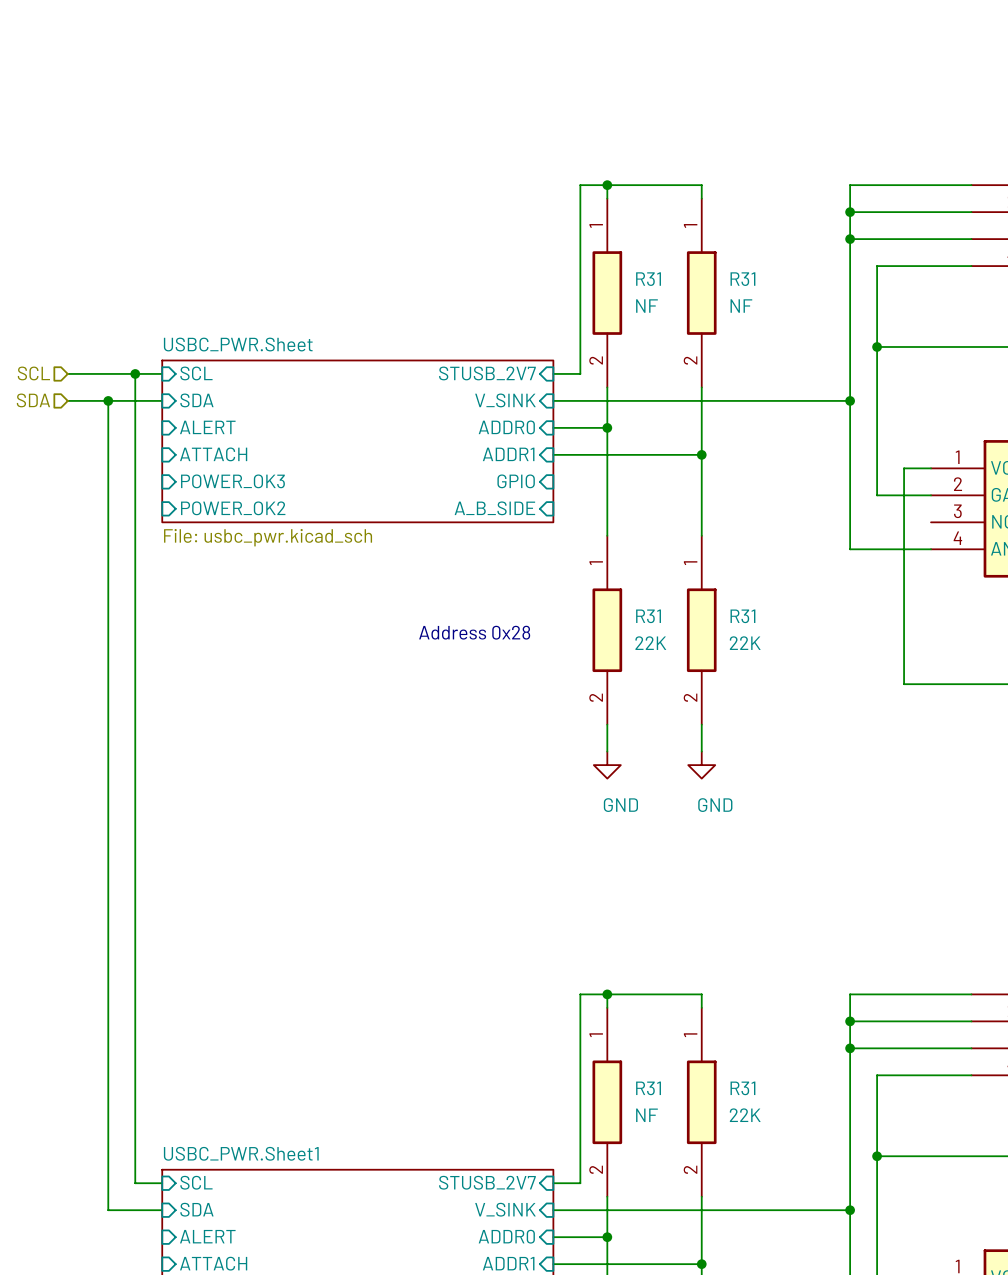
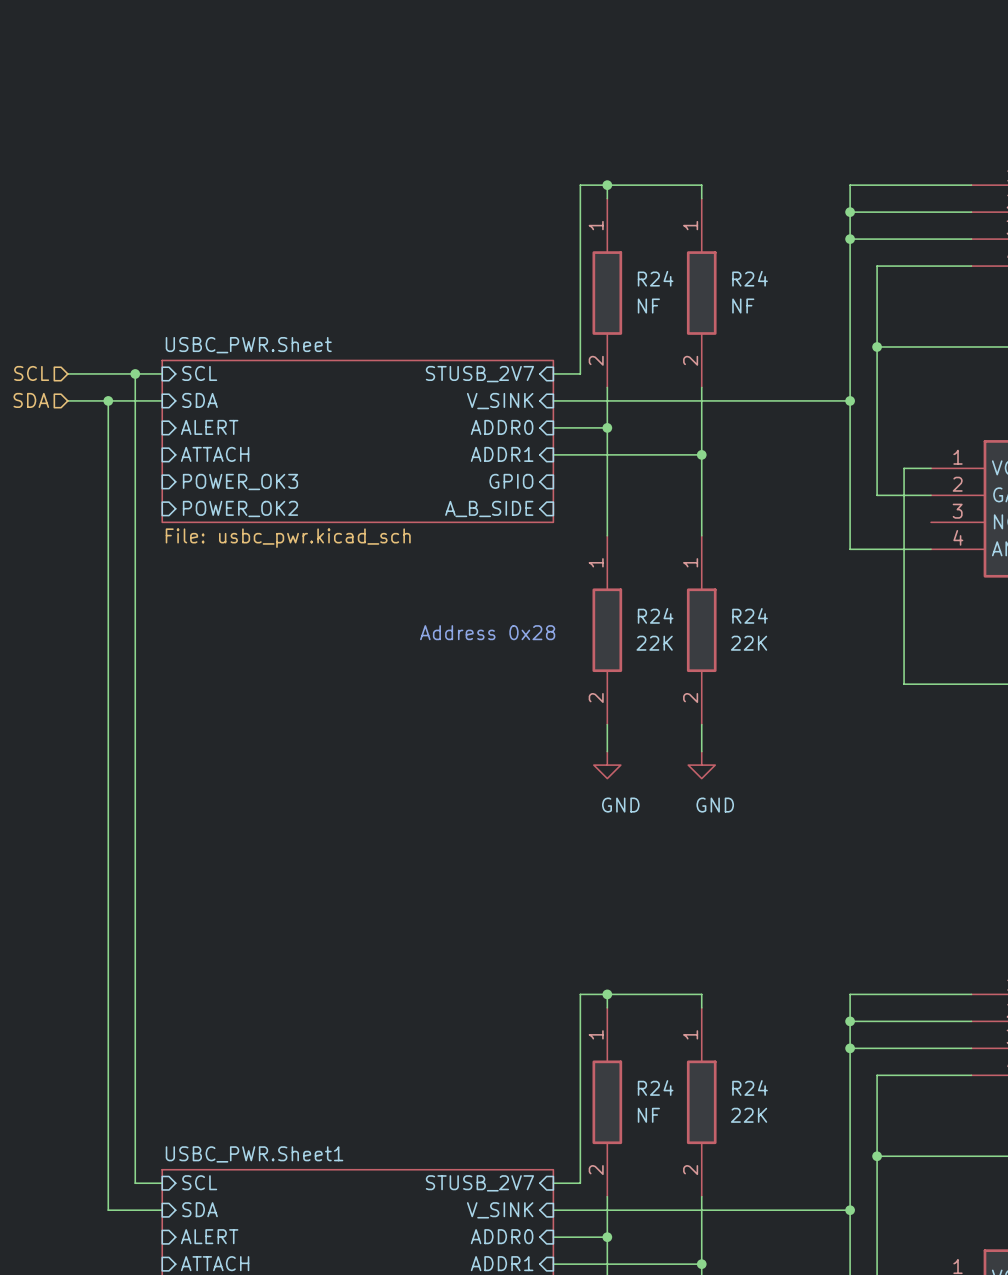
R31 name: R31 (648, 279) -> R24 (655, 278)
R31 name: R31 (742, 279) -> R24 (750, 278)
R31 name: R31 (648, 616) -> R24 (655, 615)
R31 name: R31 (742, 616) -> R24 (750, 615)
R31 name: R31 (648, 1088) -> R24 (655, 1087)
R31 name: R31 (742, 1088) -> R24 (750, 1087)

